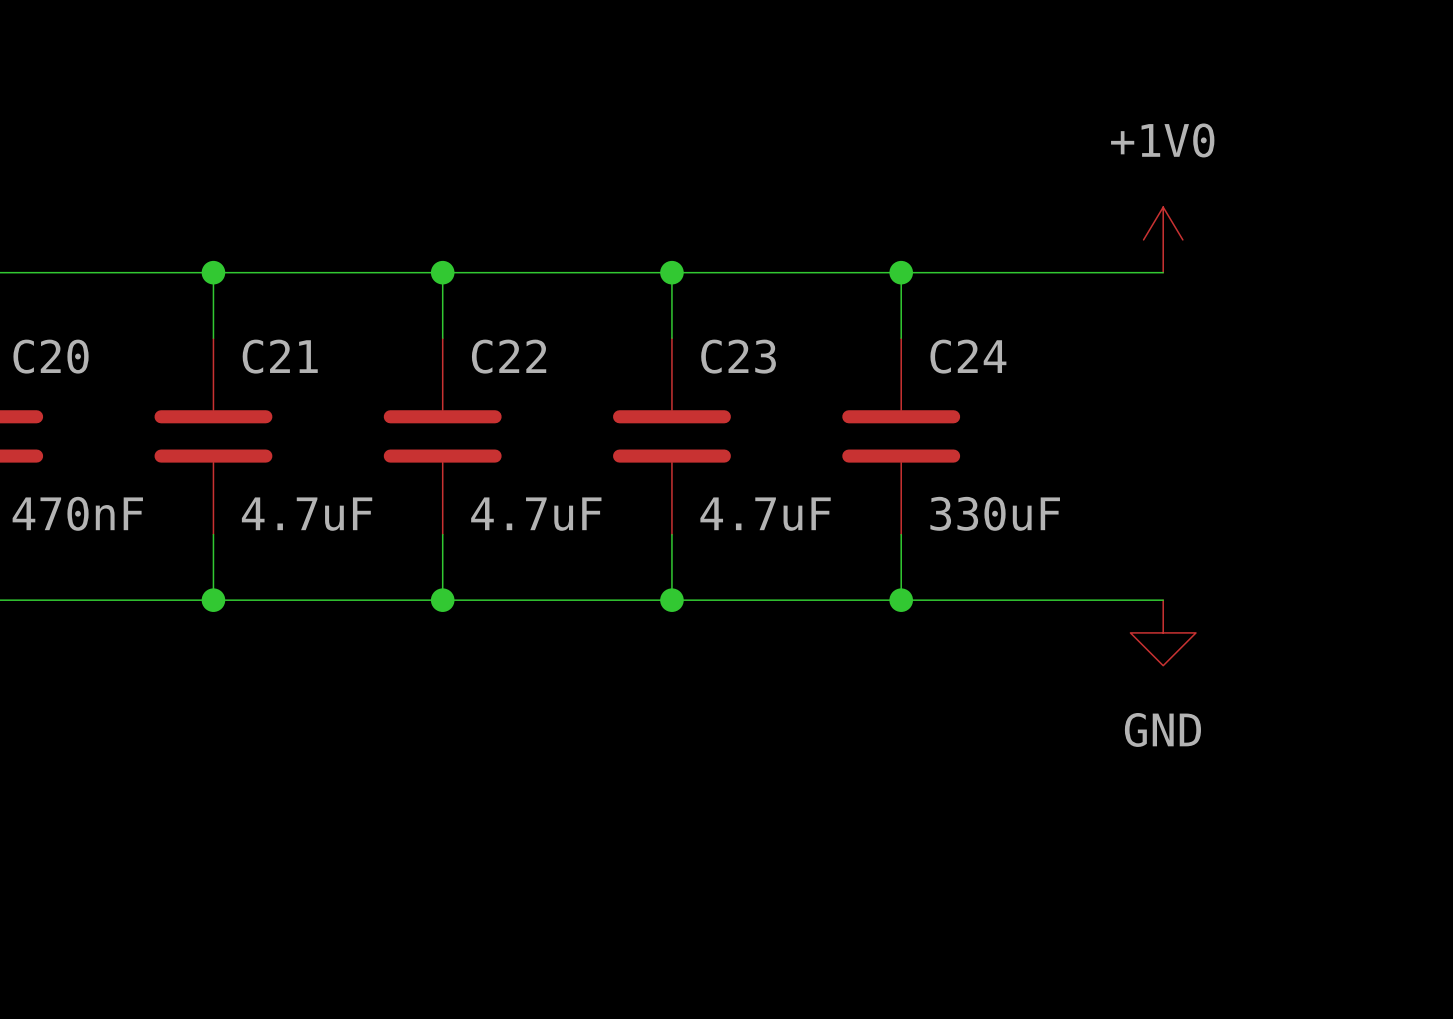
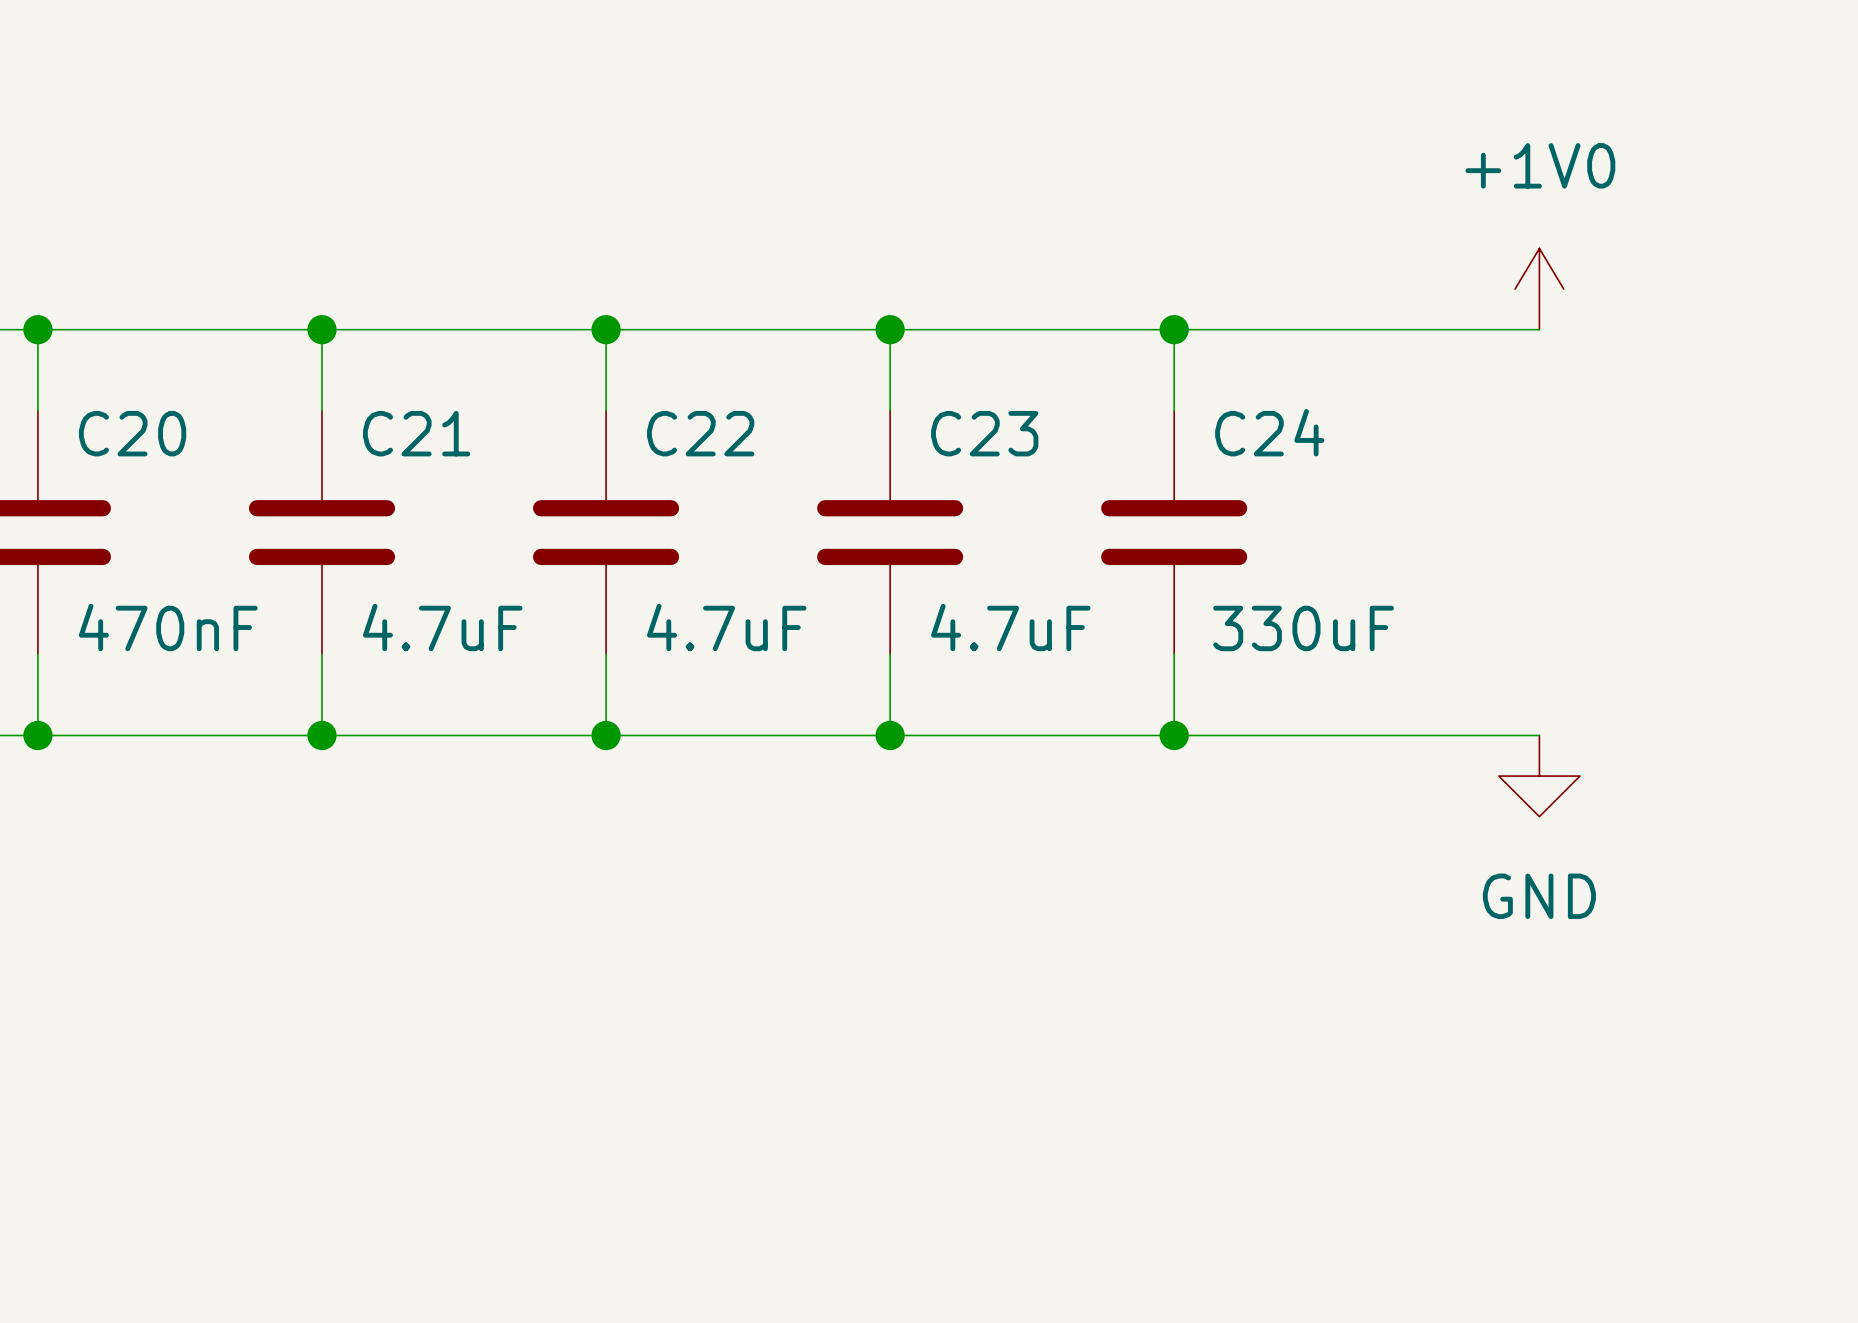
power symbol position: +1V0 (1163, 239) -> +1V0 (1539, 289)
wire: none -> (1498, 329) (1539, 329)
wire: none -> (1498, 735) (1539, 735)
power symbol position: GND (1163, 632) -> GND (1539, 776)

